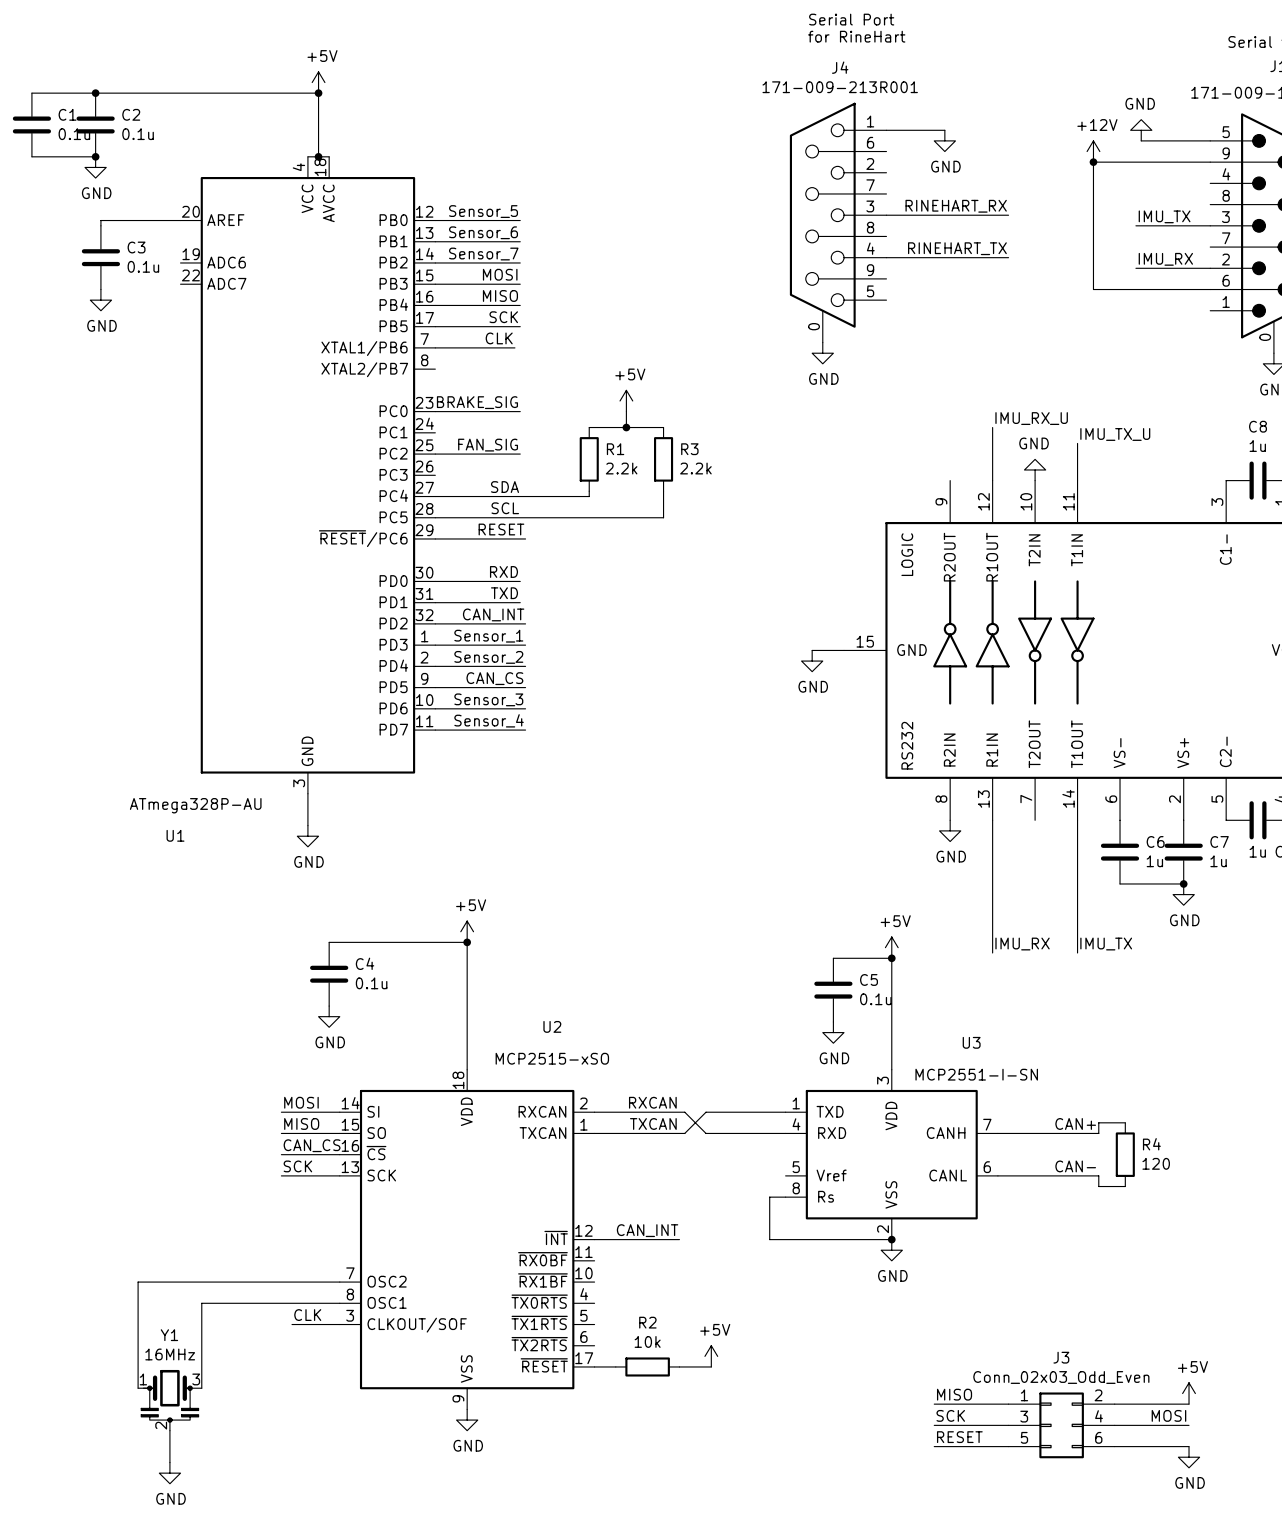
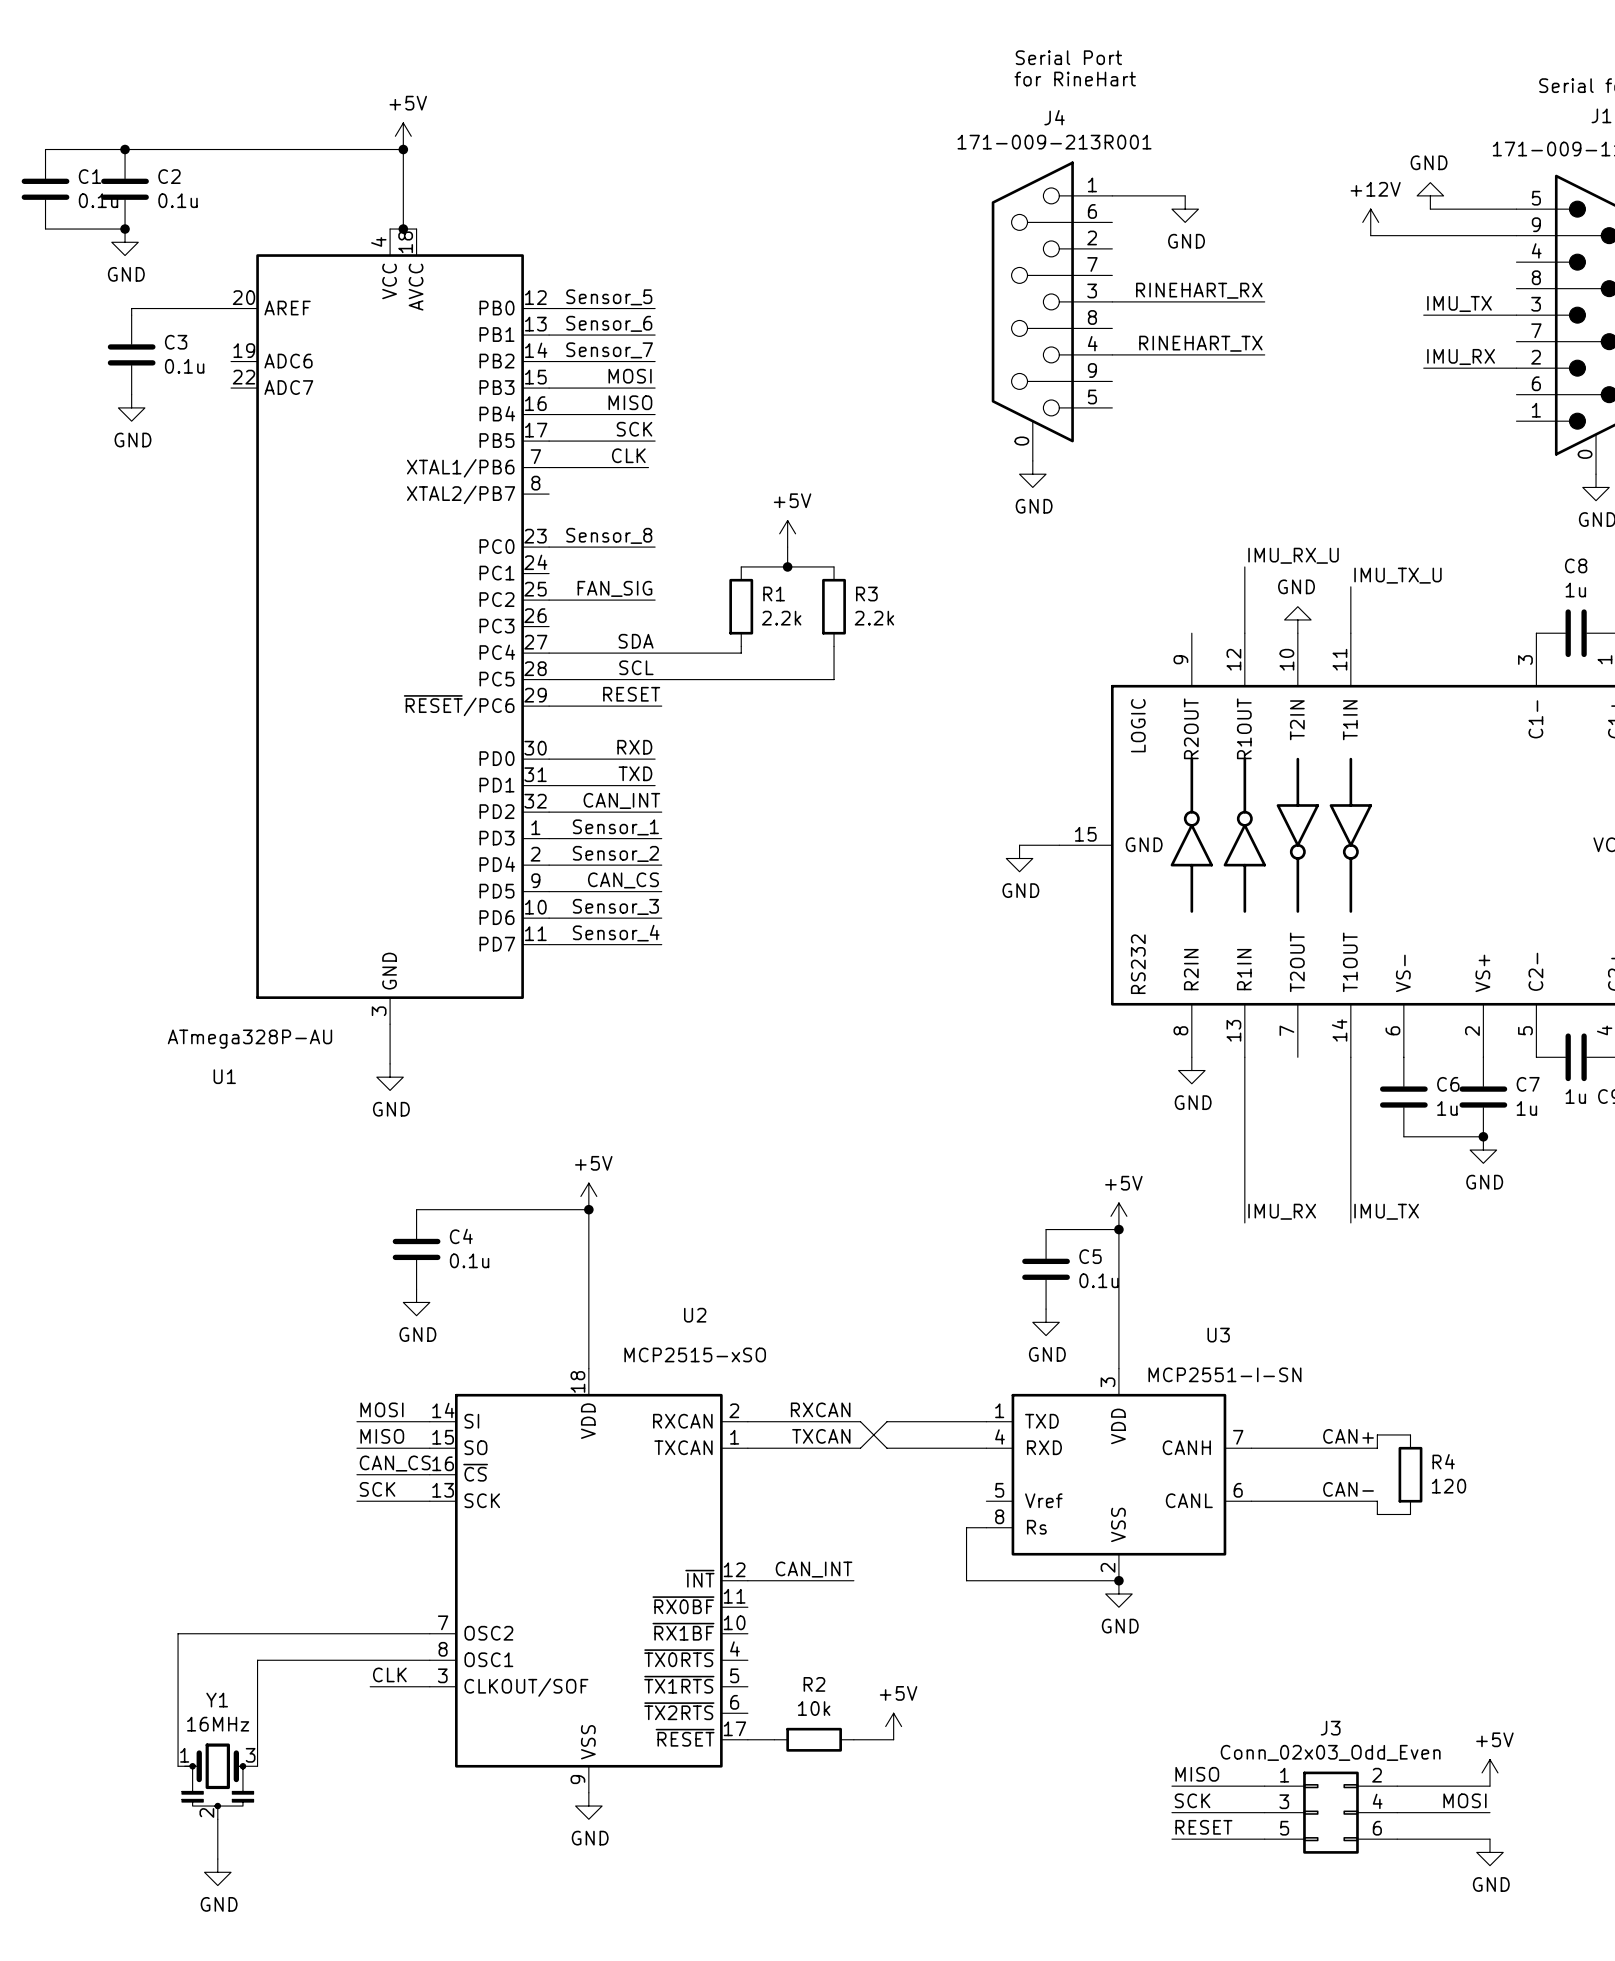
wire: (1093, 162) (1093, 289) (1210, 289) -> none
junction: (1093, 162) -> none
label: BRAKE_SIG (477, 402) -> Sensor_8 (609, 535)

